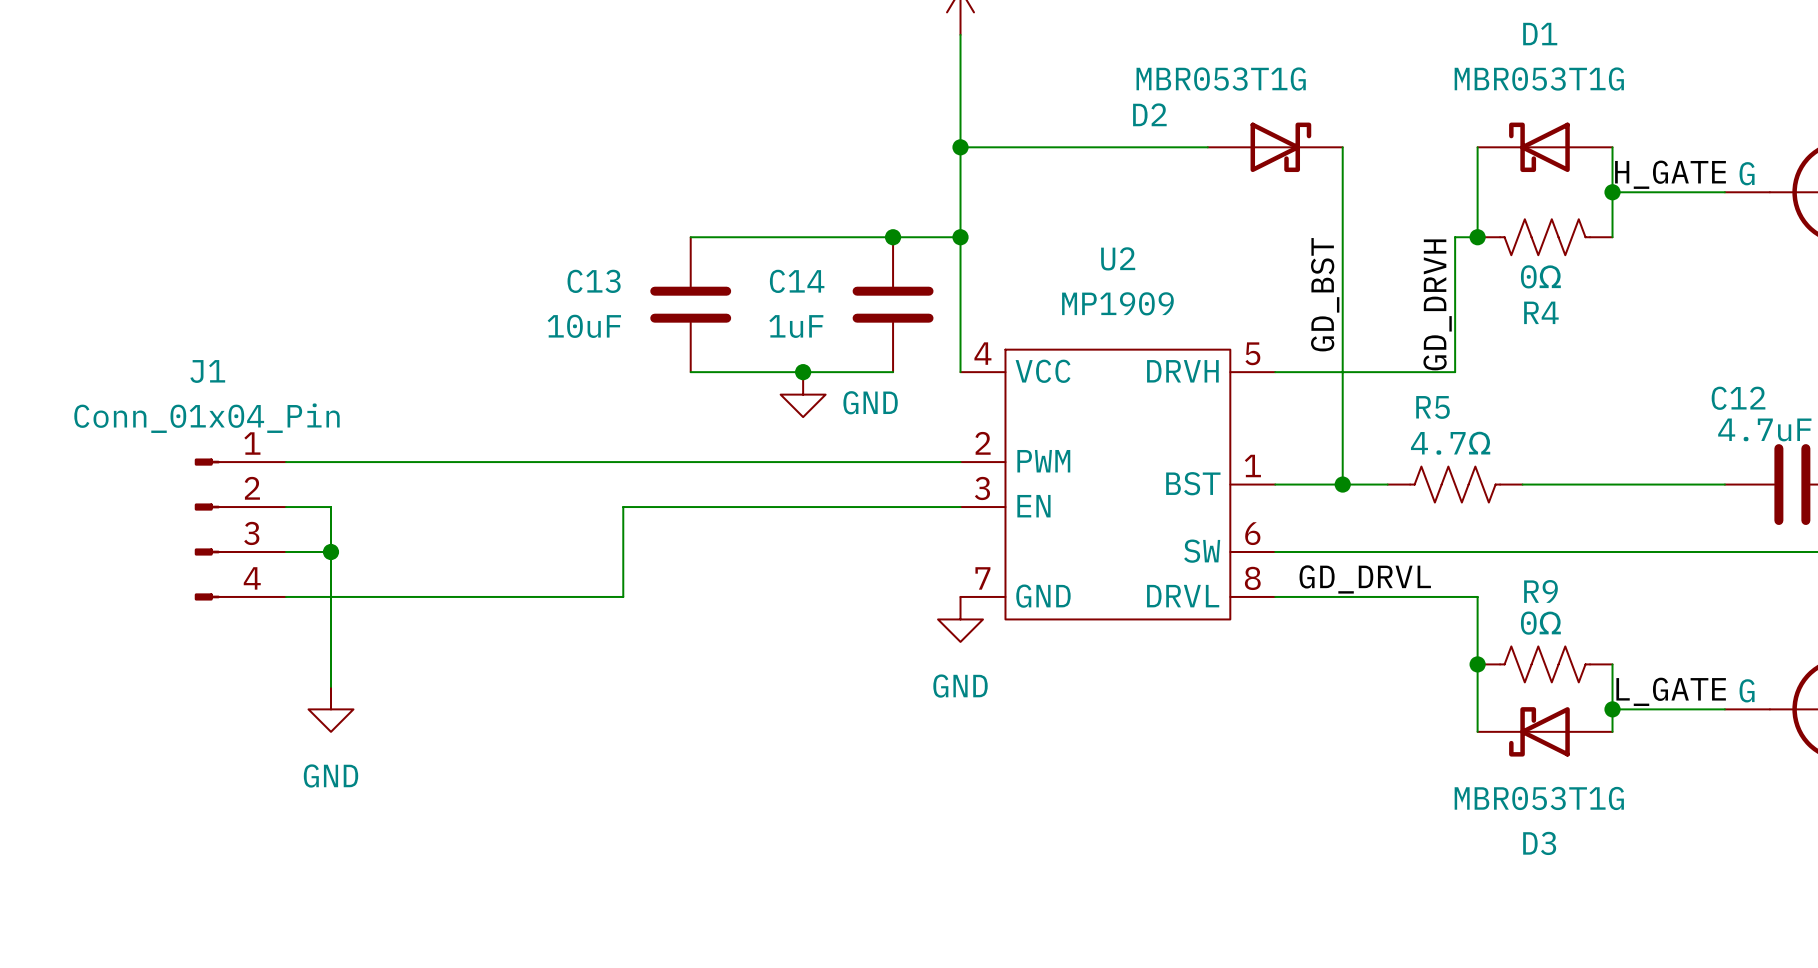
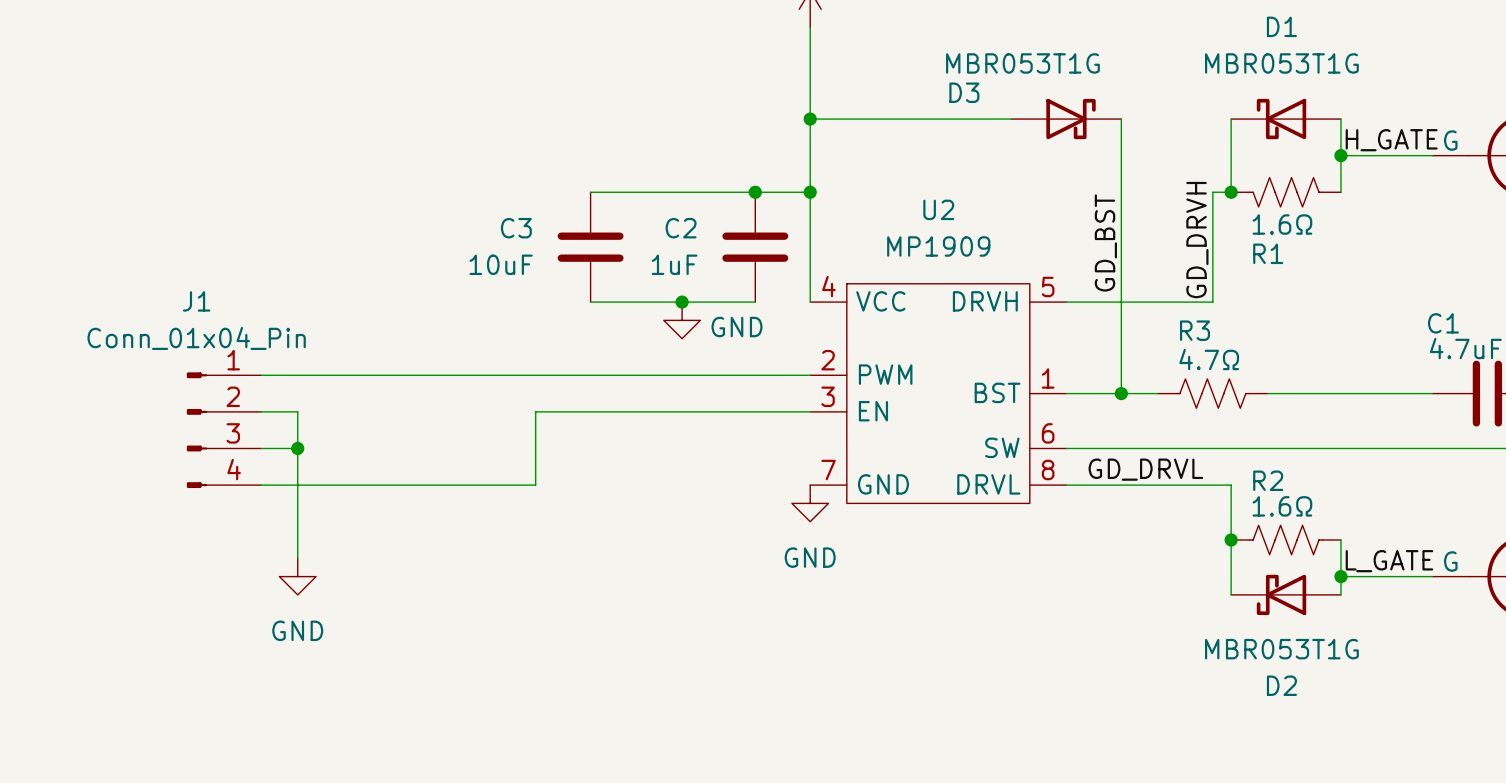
D2 name: D2 (1149, 114) -> D3 (964, 92)
R4 value: 0Ω (1540, 276) -> 1.6Ω (1282, 224)
C13 name: C13 (594, 281) -> C3 (516, 228)
C14 name: C14 (797, 281) -> C2 (681, 228)
R4 name: R4 (1541, 312) -> R1 (1268, 253)
C12 name: C12 (1738, 398) -> C1 (1443, 323)
R5 name: R5 (1433, 407) -> R3 (1194, 330)
R9 name: R9 (1540, 591) -> R2 (1268, 480)
R9 value: 0Ω (1540, 623) -> 1.6Ω (1282, 506)
D3 name: D3 (1539, 843) -> D2 (1281, 685)

